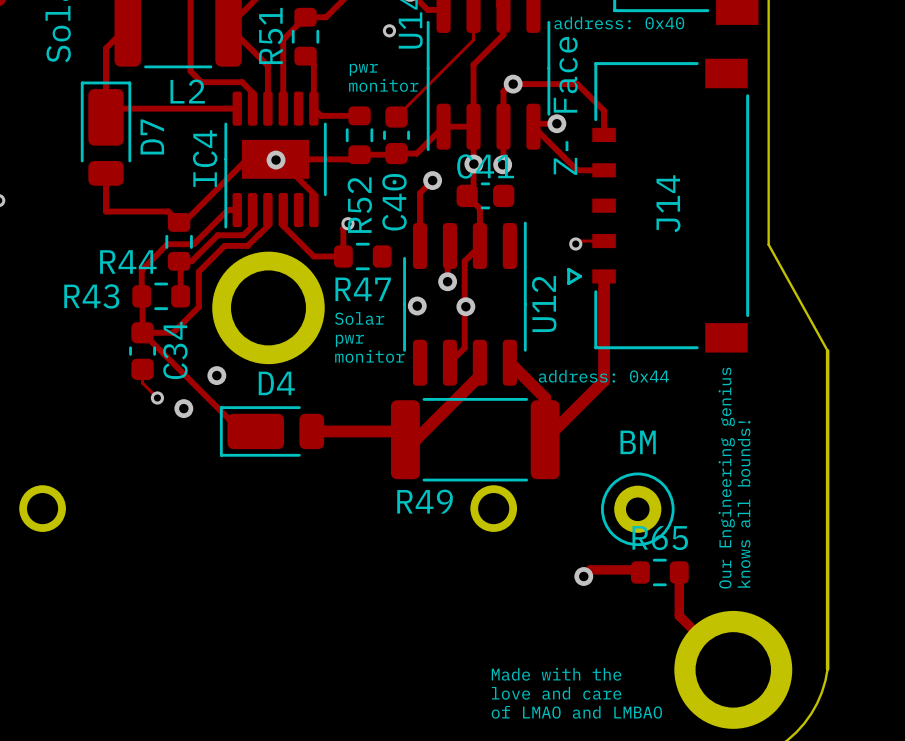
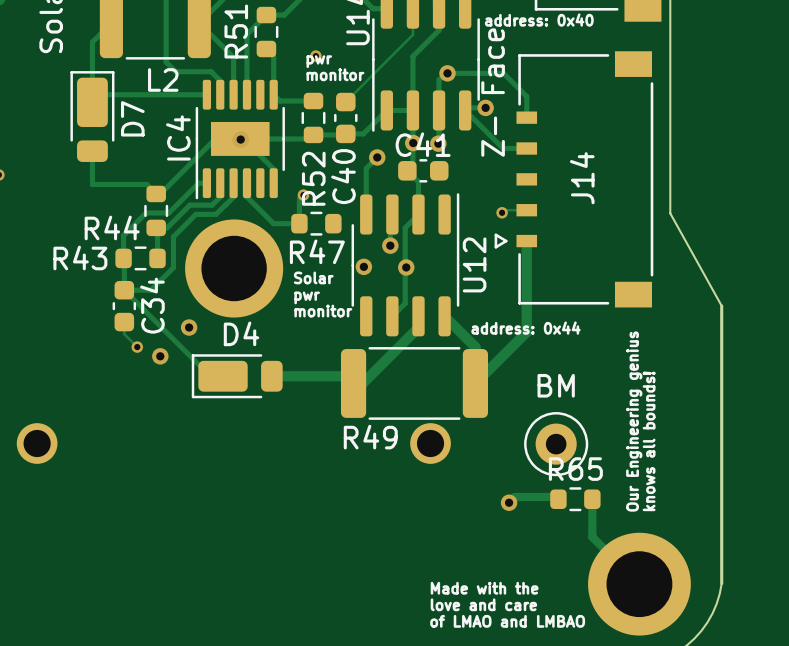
via position: (389, 30) -> (315, 56)

